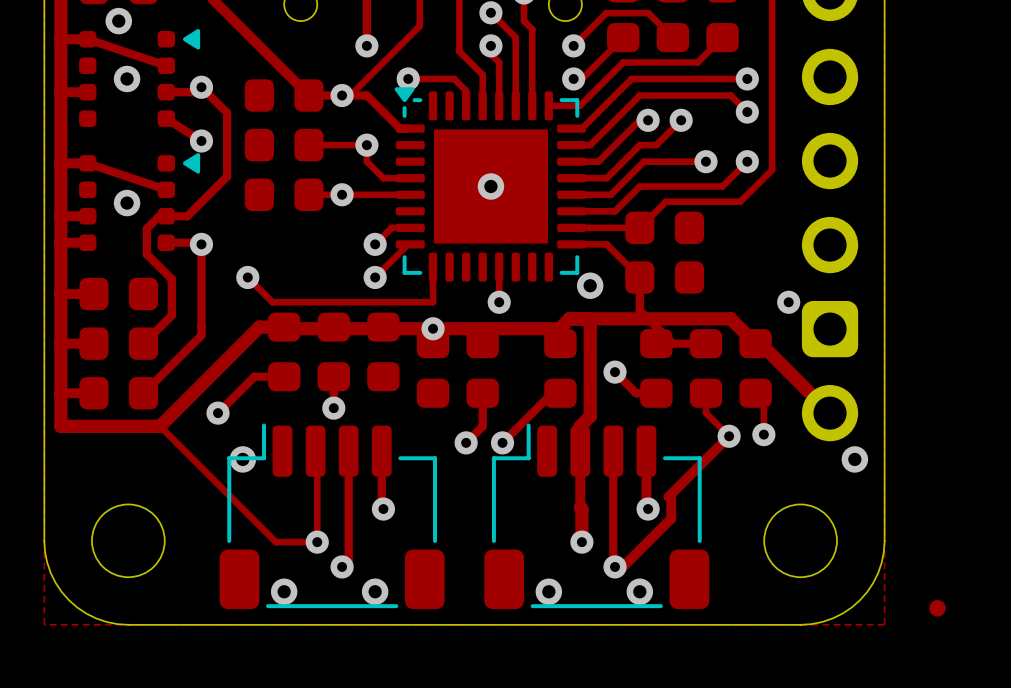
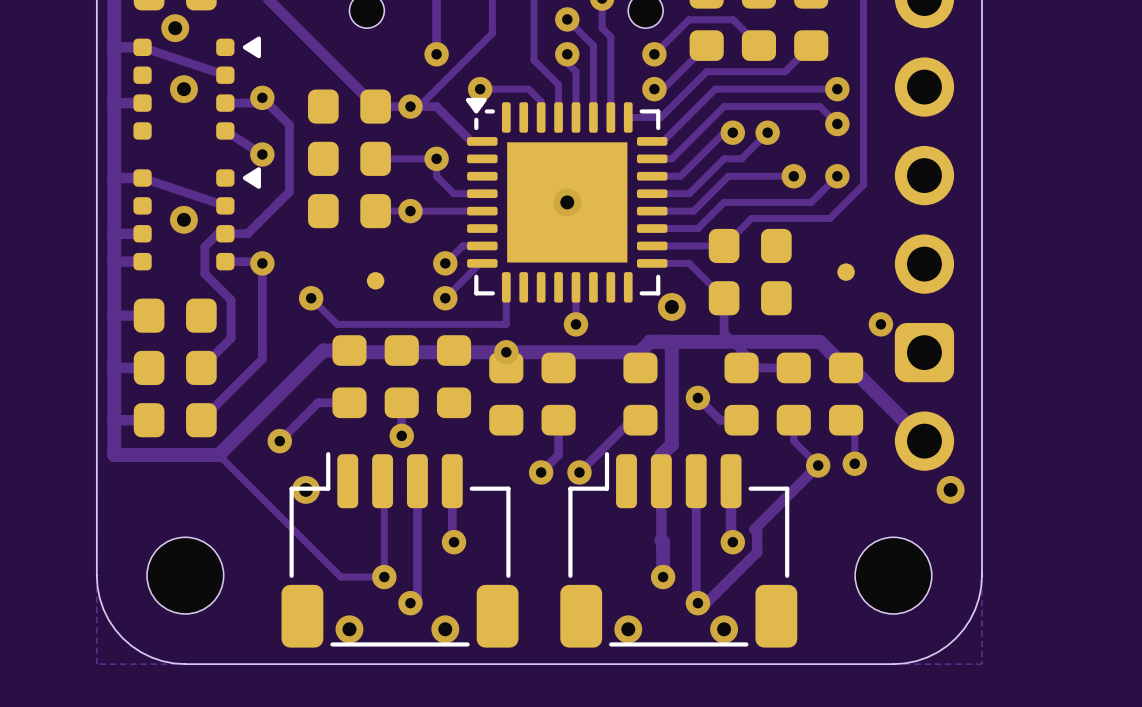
part: none -> (846, 272)
part: none -> (375, 280)
part: (937, 608) -> none

